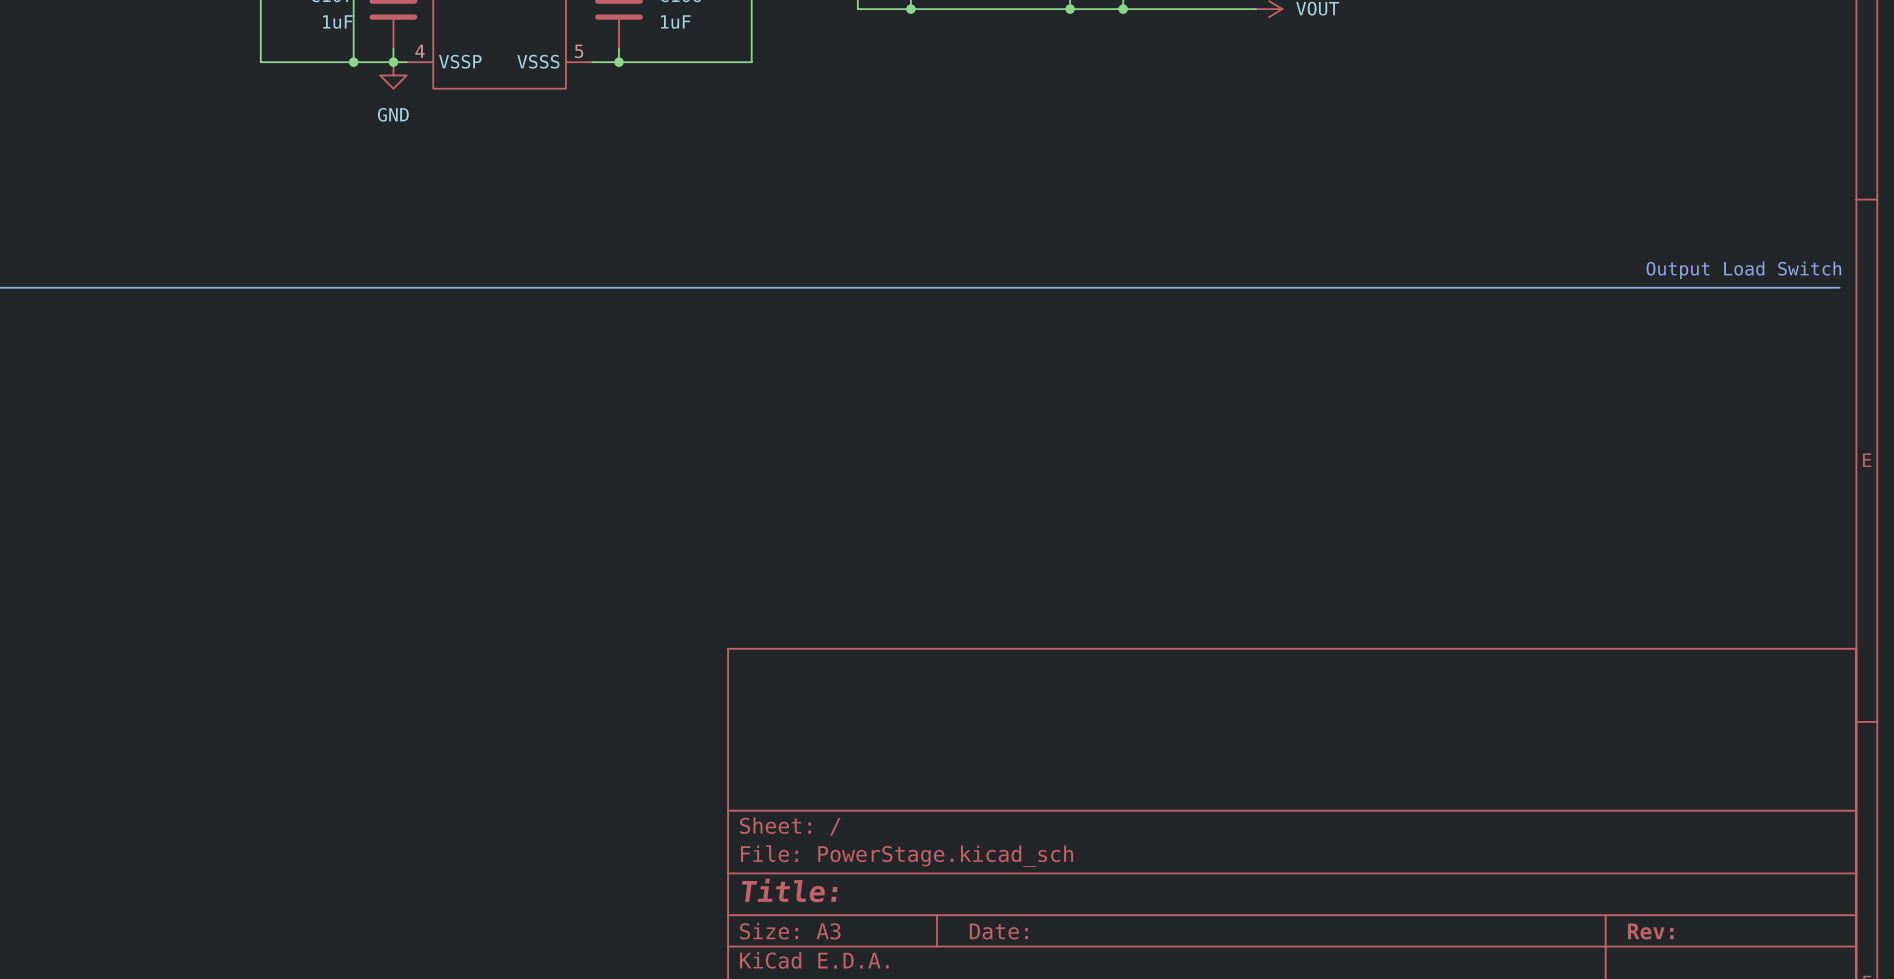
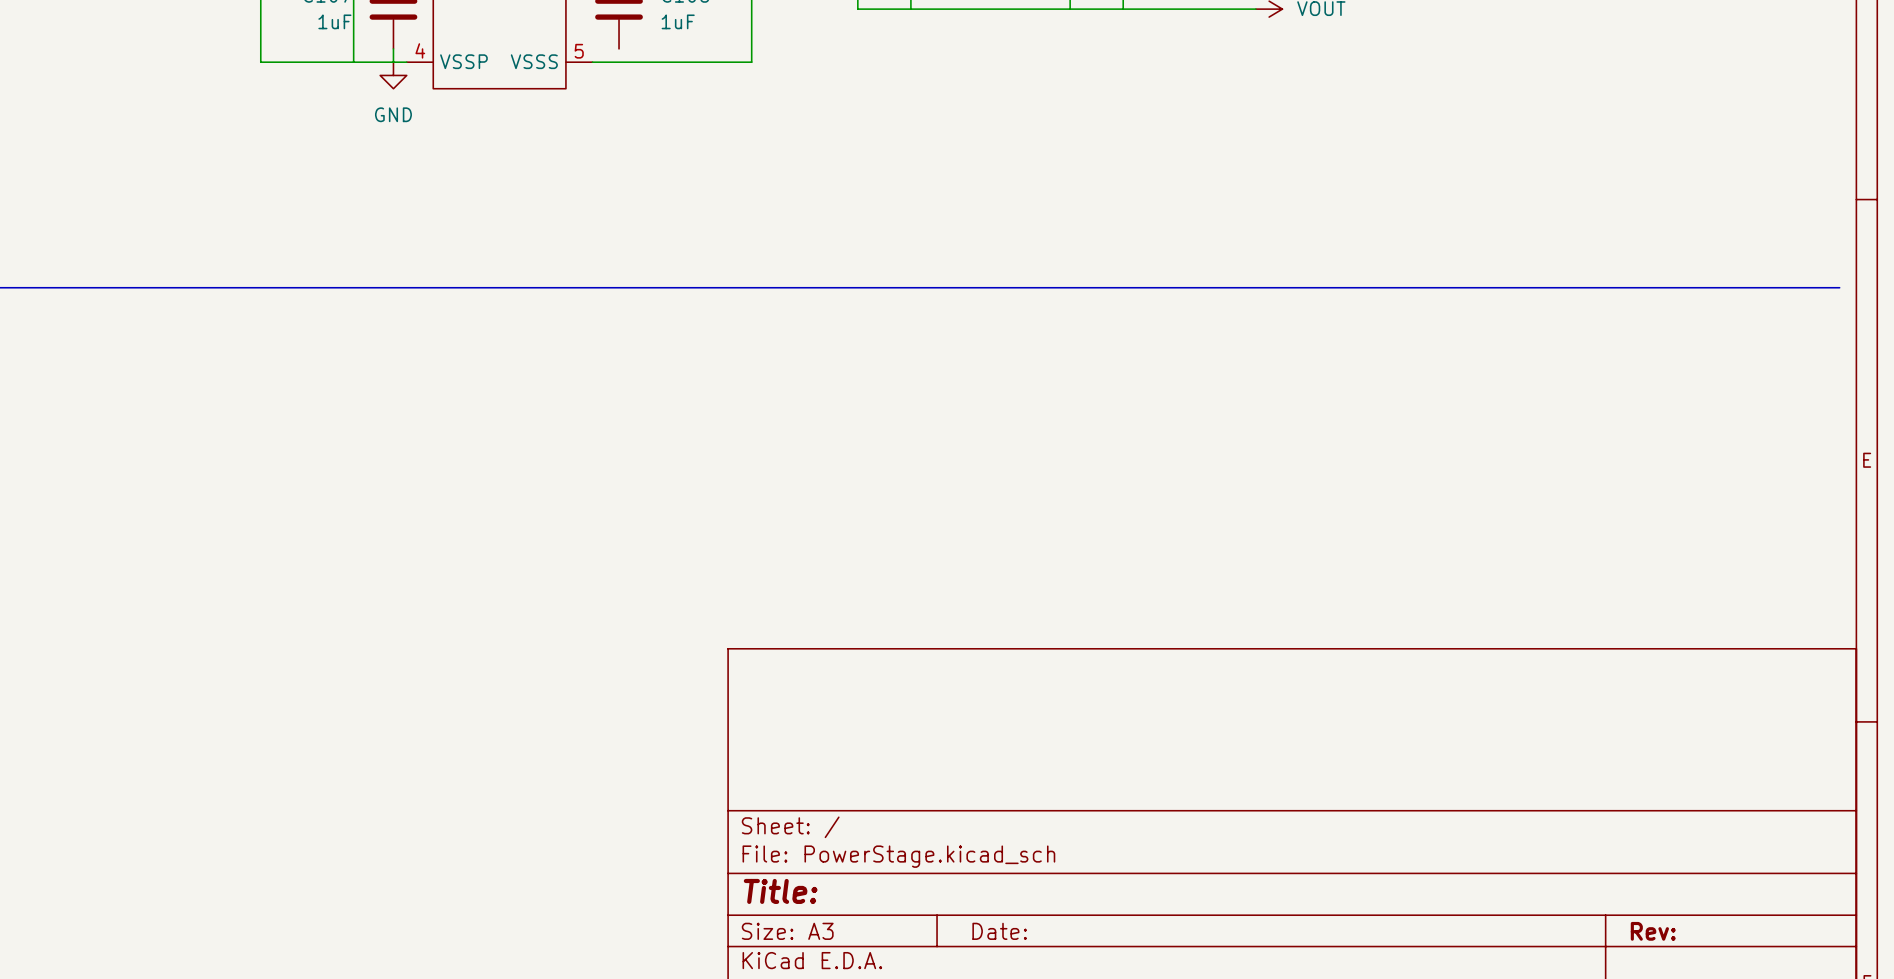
junction: (910, 9) -> none
junction: (1070, 9) -> none
junction: (1123, 9) -> none
wire: (619, 48) (619, 62) -> none
junction: (353, 62) -> none
junction: (393, 62) -> none
junction: (619, 62) -> none
text: Output Load Switch (1743, 270) -> none

